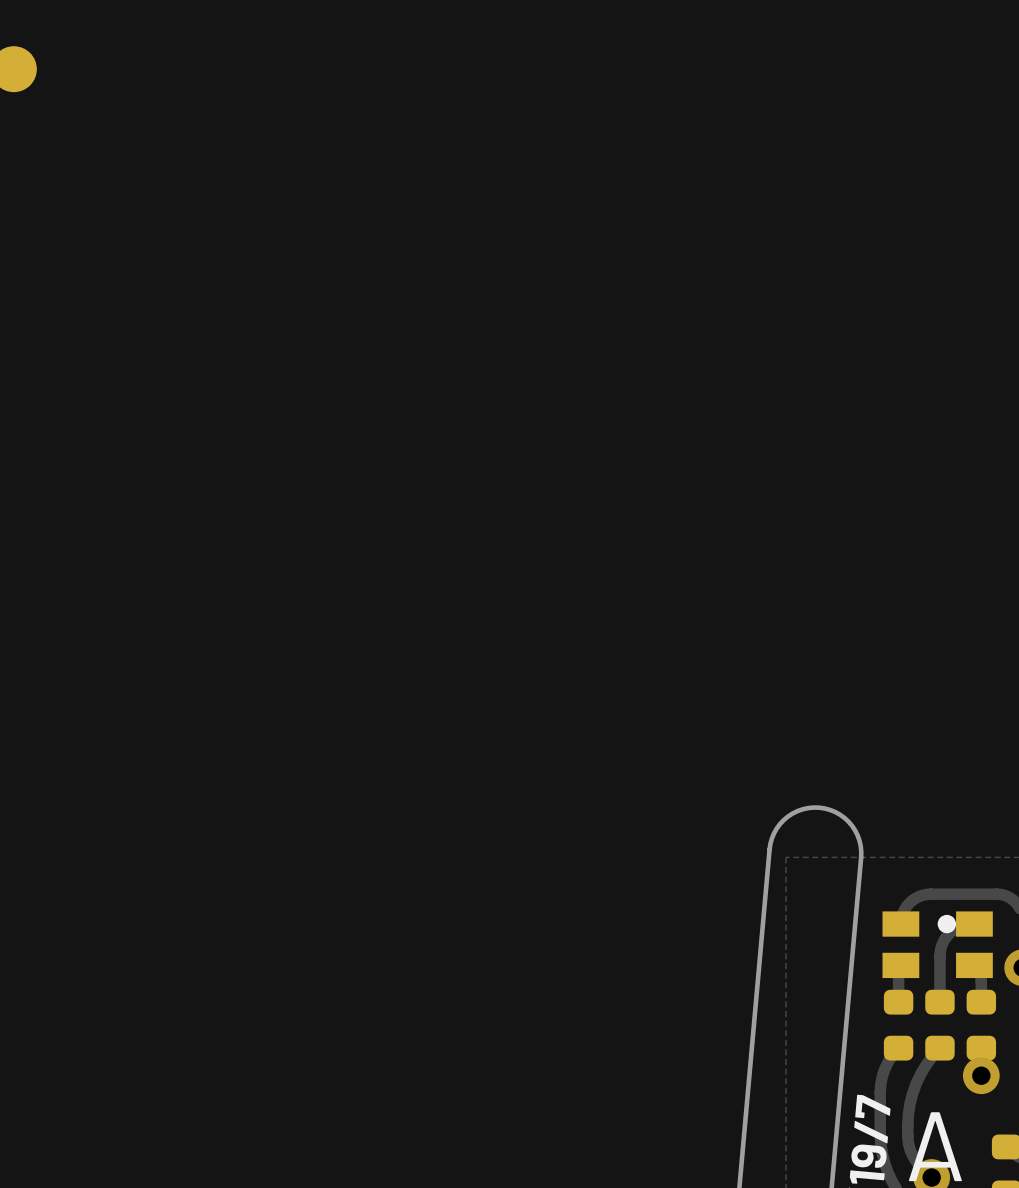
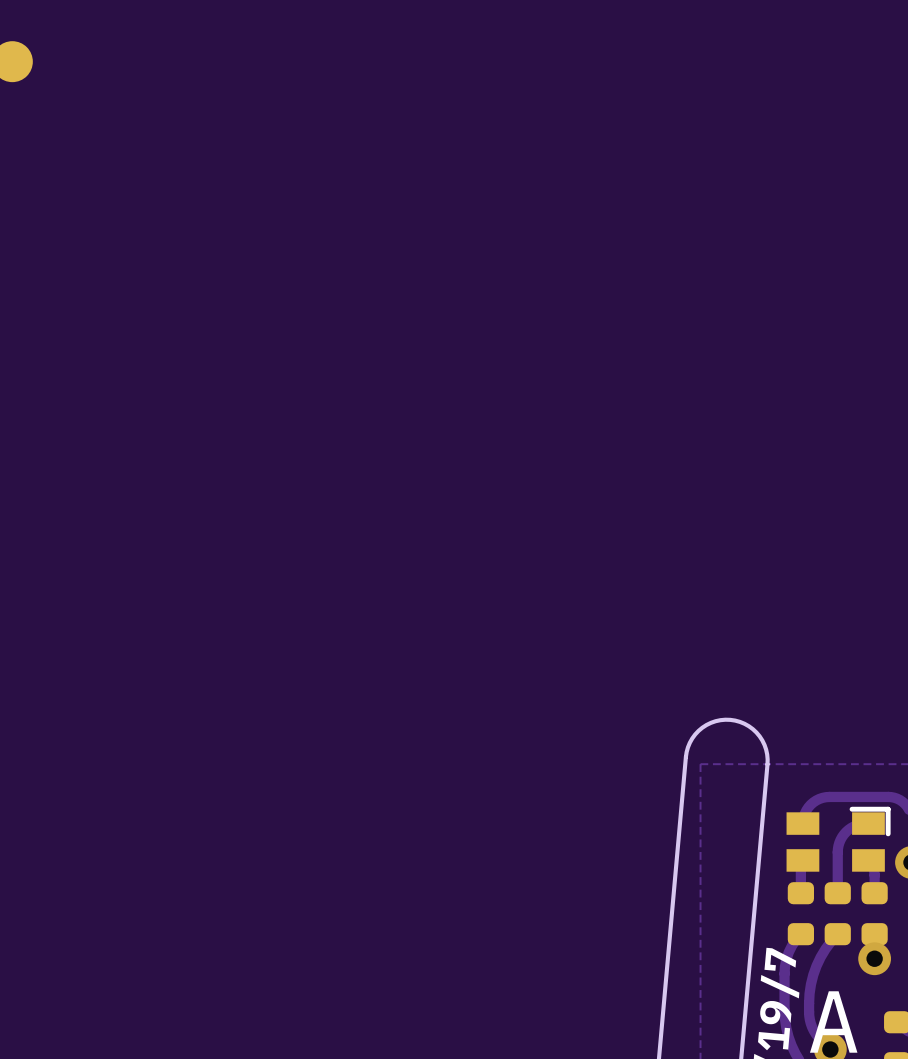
part footprint: [882, 911, 993, 979] -> [786, 806, 891, 872]

